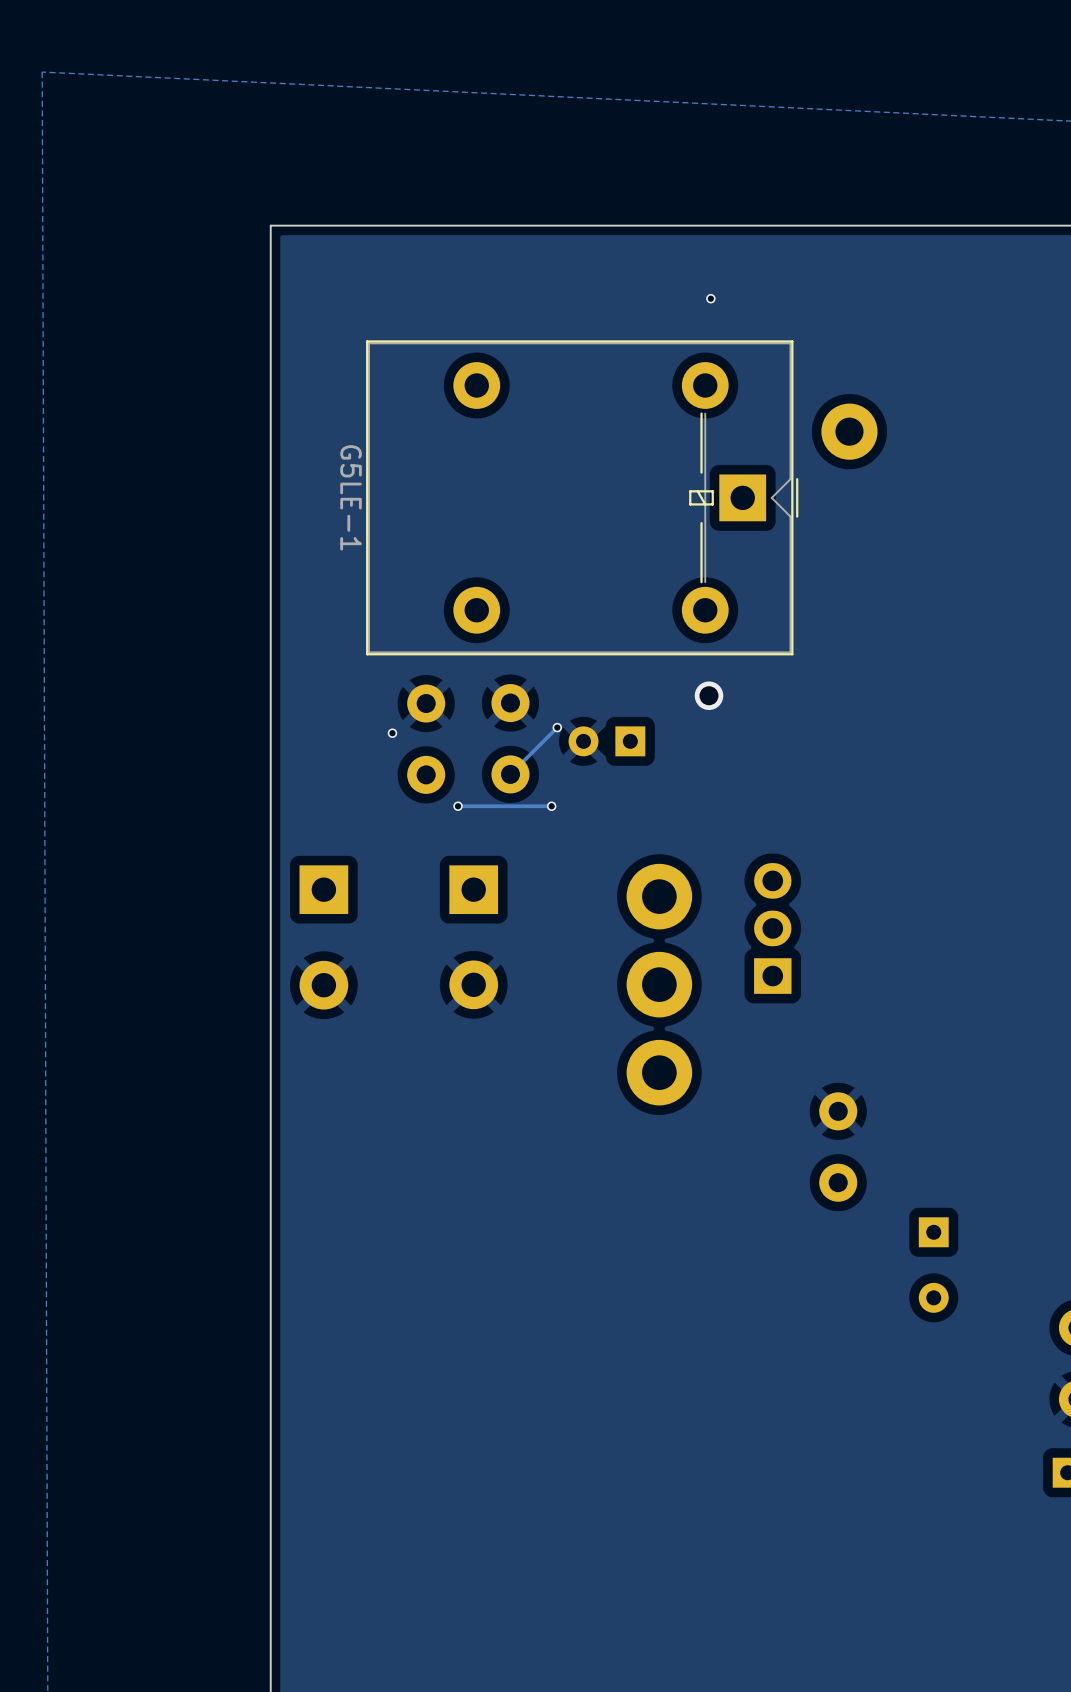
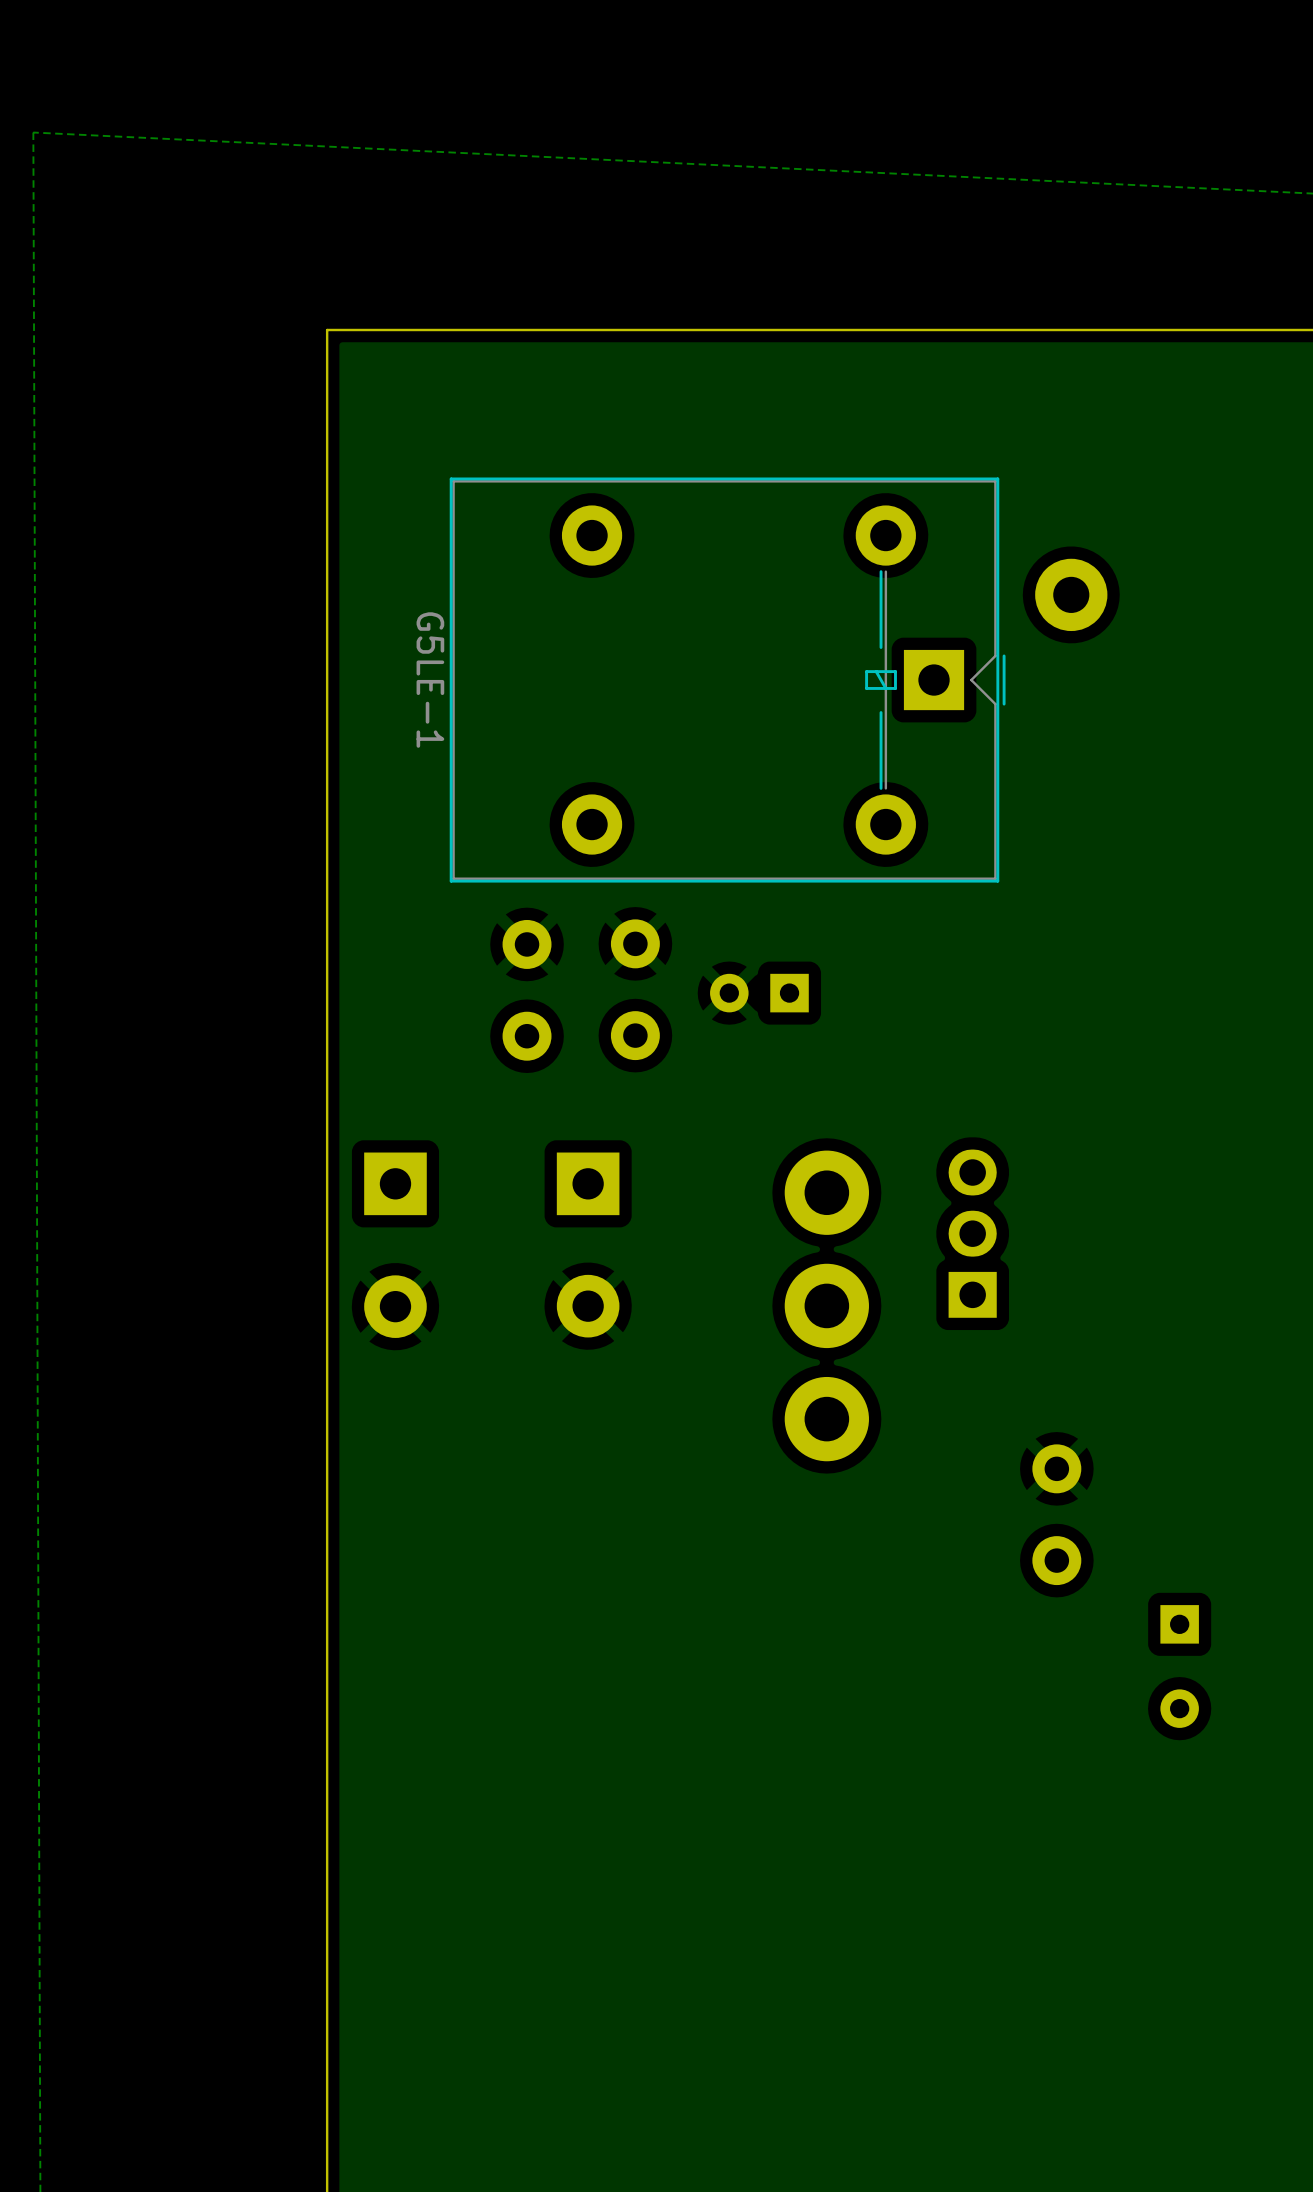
via: (710, 298) -> none
via: (709, 695) -> none
track: (557, 727) (510, 774) -> none
via: (557, 727) -> none
via: (392, 733) -> none
via: (458, 806) -> none
track: (551, 806) (458, 806) -> none
via: (551, 806) -> none

